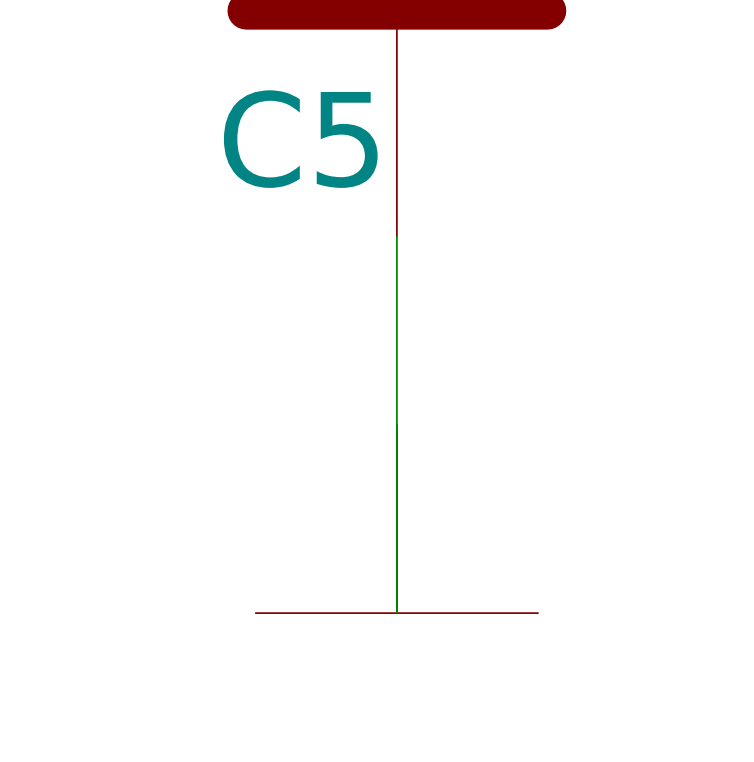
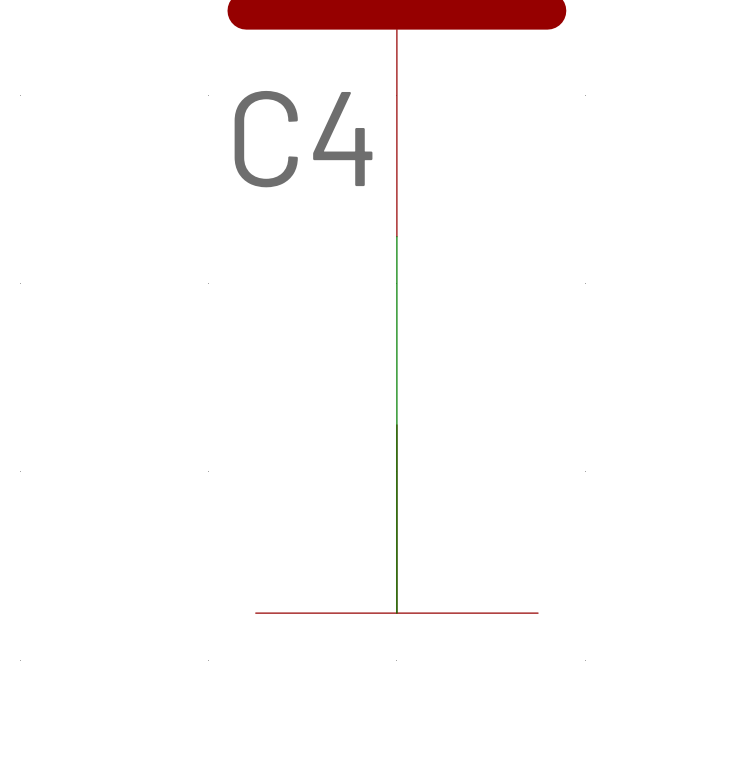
C5 name: C5 (300, 139) -> C4 (303, 139)

